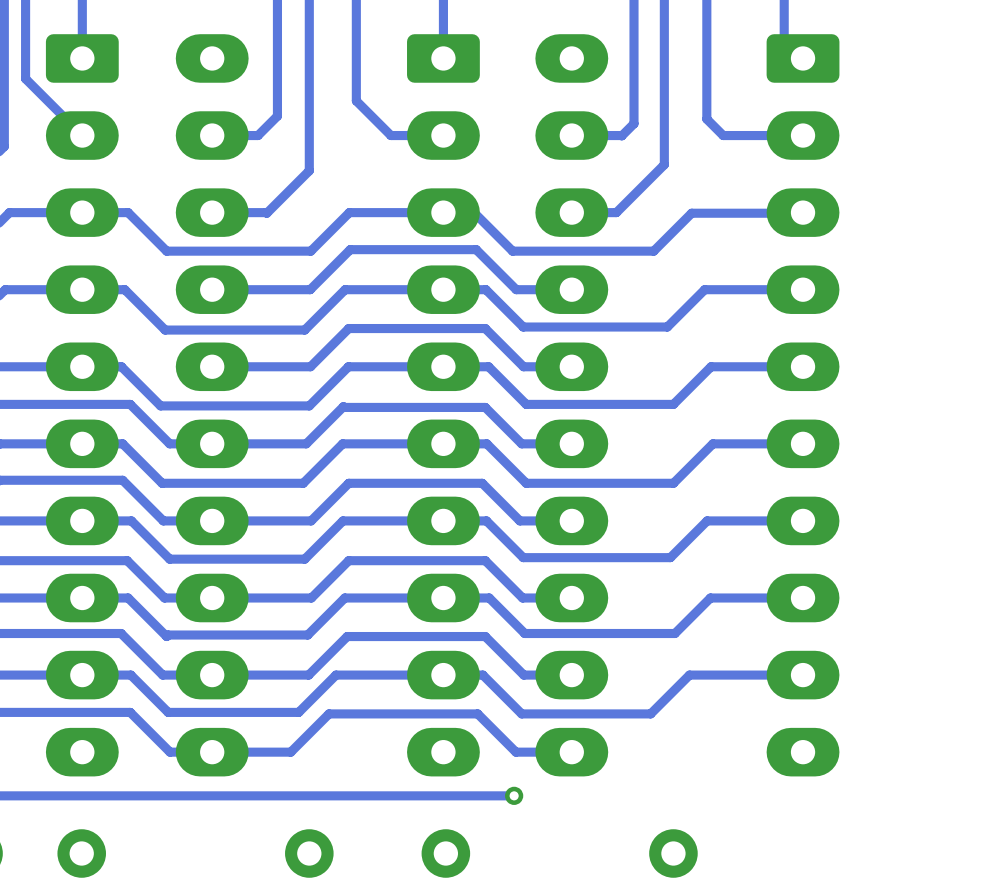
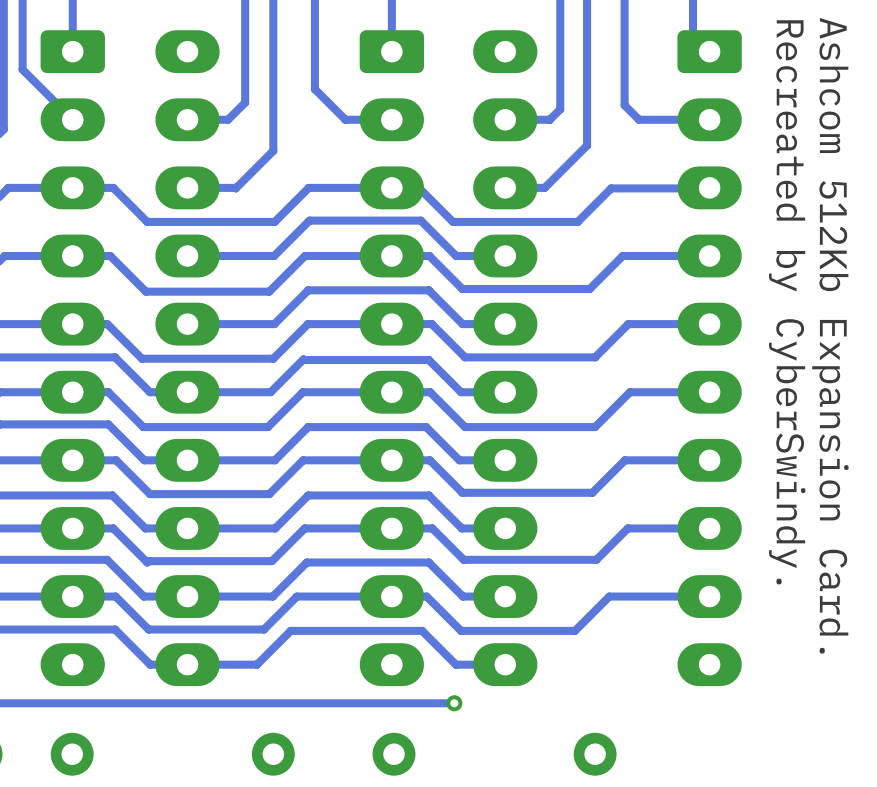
text: none -> Recreated by CyberSwindy. (787, 302)
text: none -> Ashcom 512Kb Expansion Card. (830, 335)

